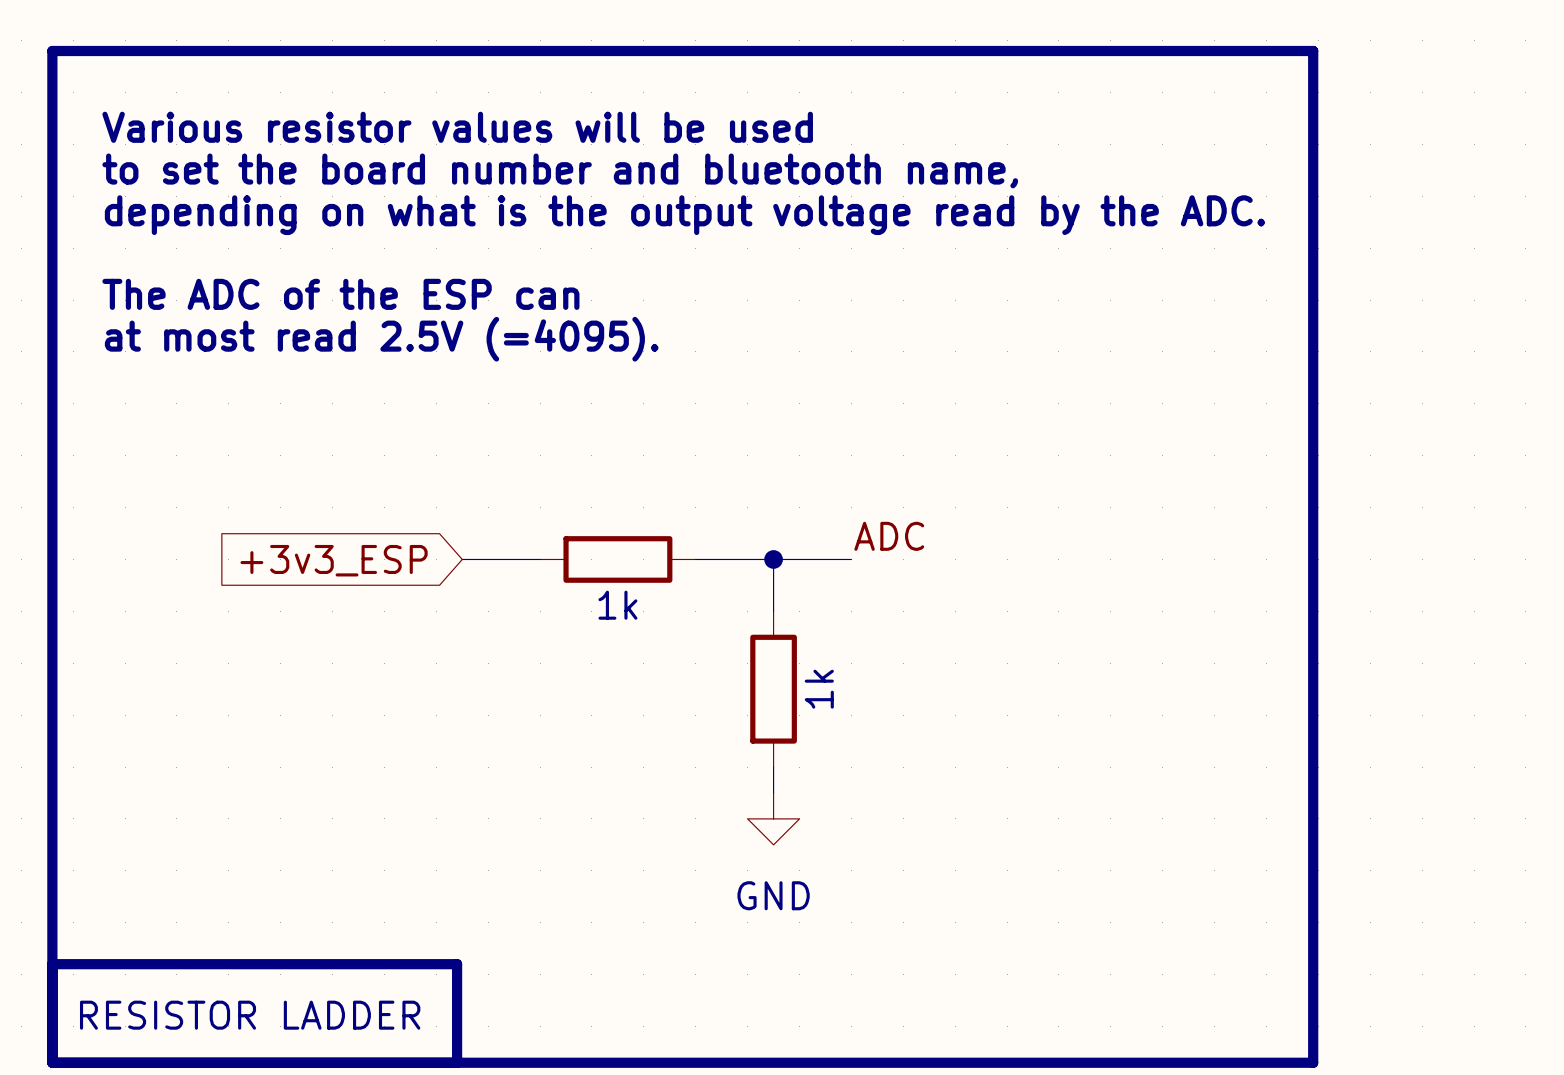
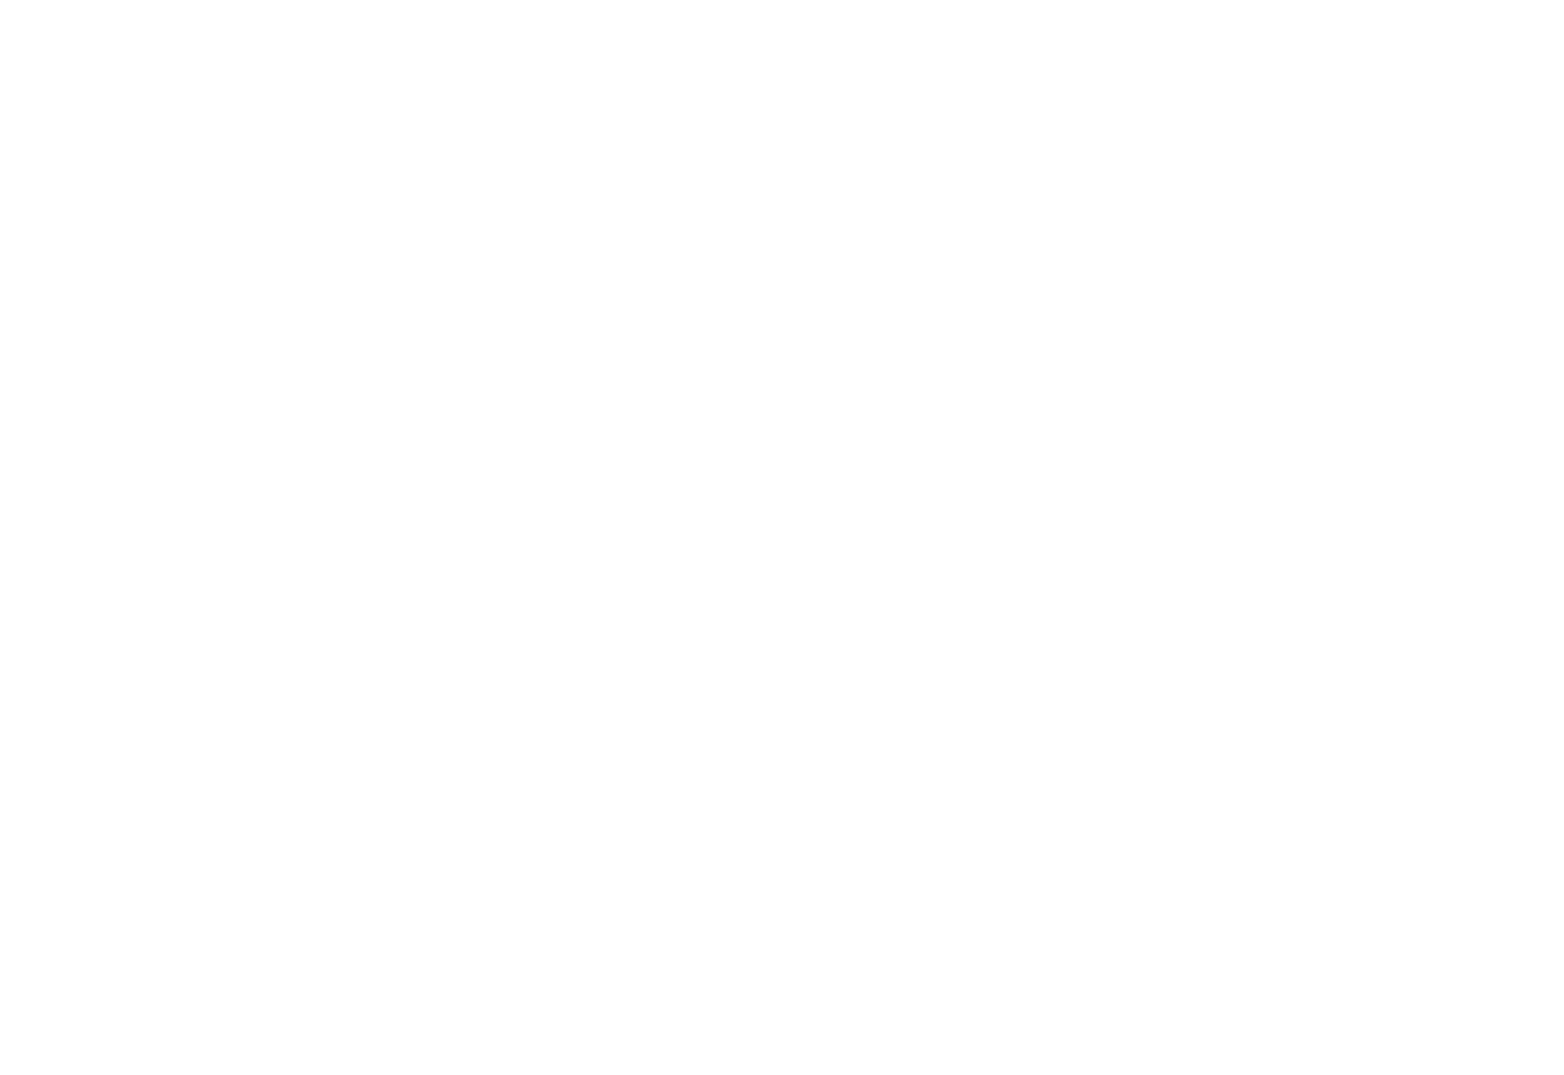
line: (52, 51) (52, 1062) (1313, 1062) (1313, 51) (52, 51) -> none
text: Various resistor values will be used (457, 127) -> none
text: to set the board number and bluetooth name, (560, 170) -> none
text: depending on what is the output voltage read by the ADC. (684, 215) -> none
text: The ADC of the ESP can (340, 294) -> none
text: at most read 2.5V (=4095). (381, 339) -> none
label: ADC (889, 536) -> none
wire: (462, 559) (540, 559) -> none
part: 1k (617, 559) -> none
wire: (695, 559) (851, 559) -> none
wire: (773, 559) (773, 611) -> none
junction: (773, 559) -> none
global label: +3v3_ESP (334, 560) -> none
part: 1k (773, 689) -> none
wire: (773, 767) (773, 792) -> none
power symbol: GND (773, 818) -> none
line: (52, 964) (457, 964) (457, 1062) -> none
text: RESISTOR LADDER (250, 1015) -> none

